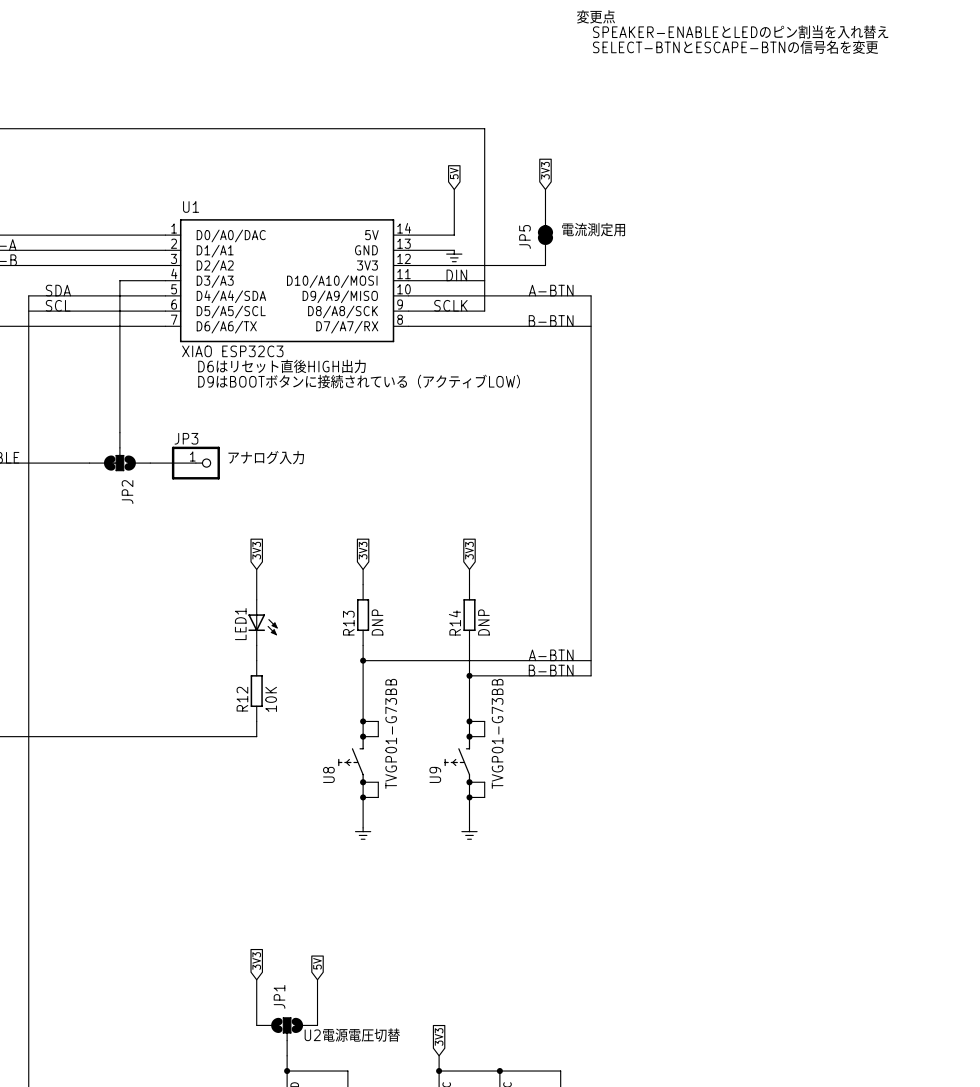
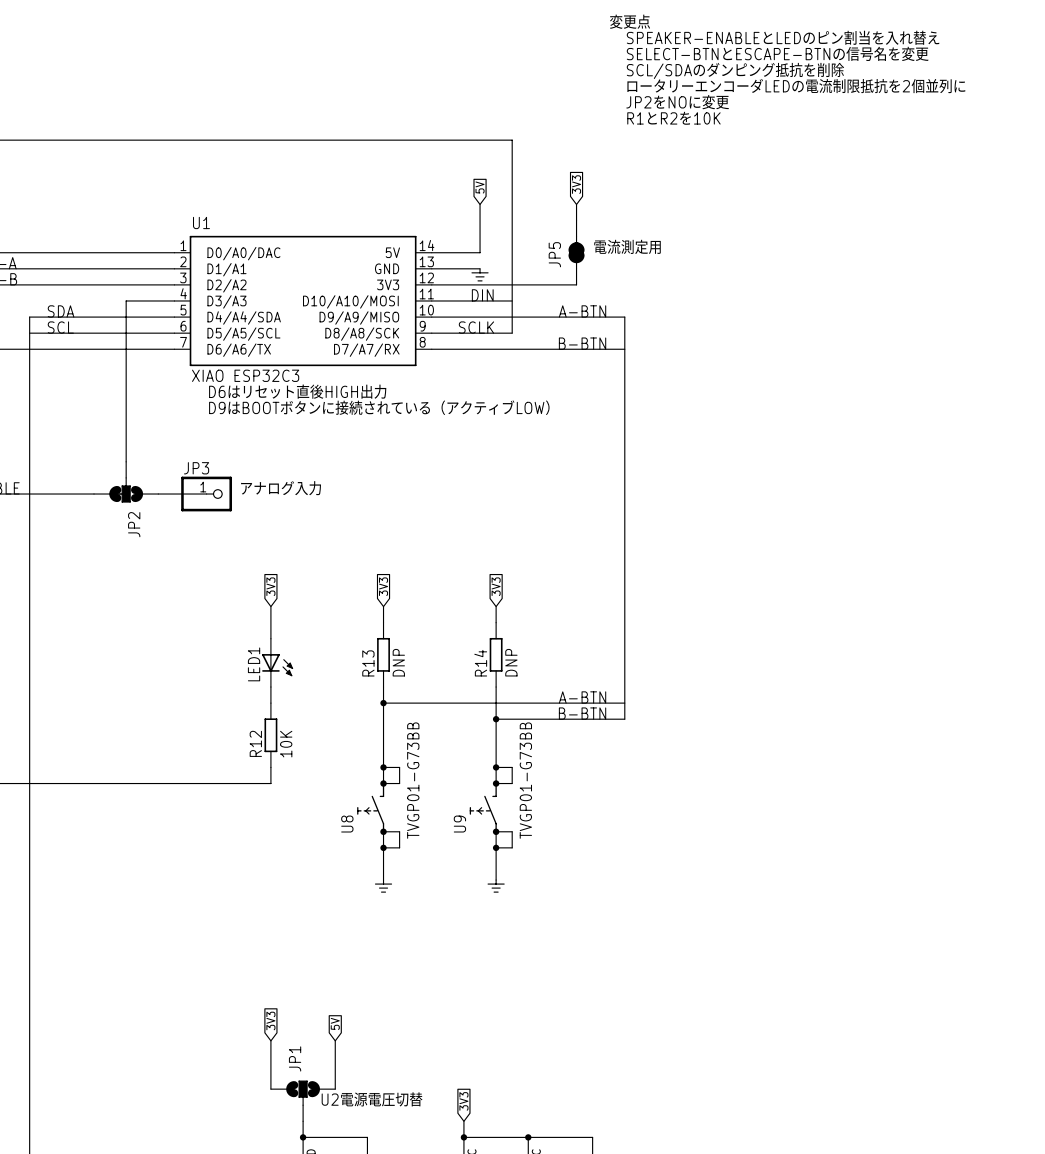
text: none -> SCL/SDAのダンピング抵抗を削除 (735, 70)
text: none -> ロータリーエンコーダLEDの電流制限抵抗を2個並列に (796, 86)
text: none -> JP2をNOに変更 (677, 102)
text: none -> R1とR2を10K (673, 118)

